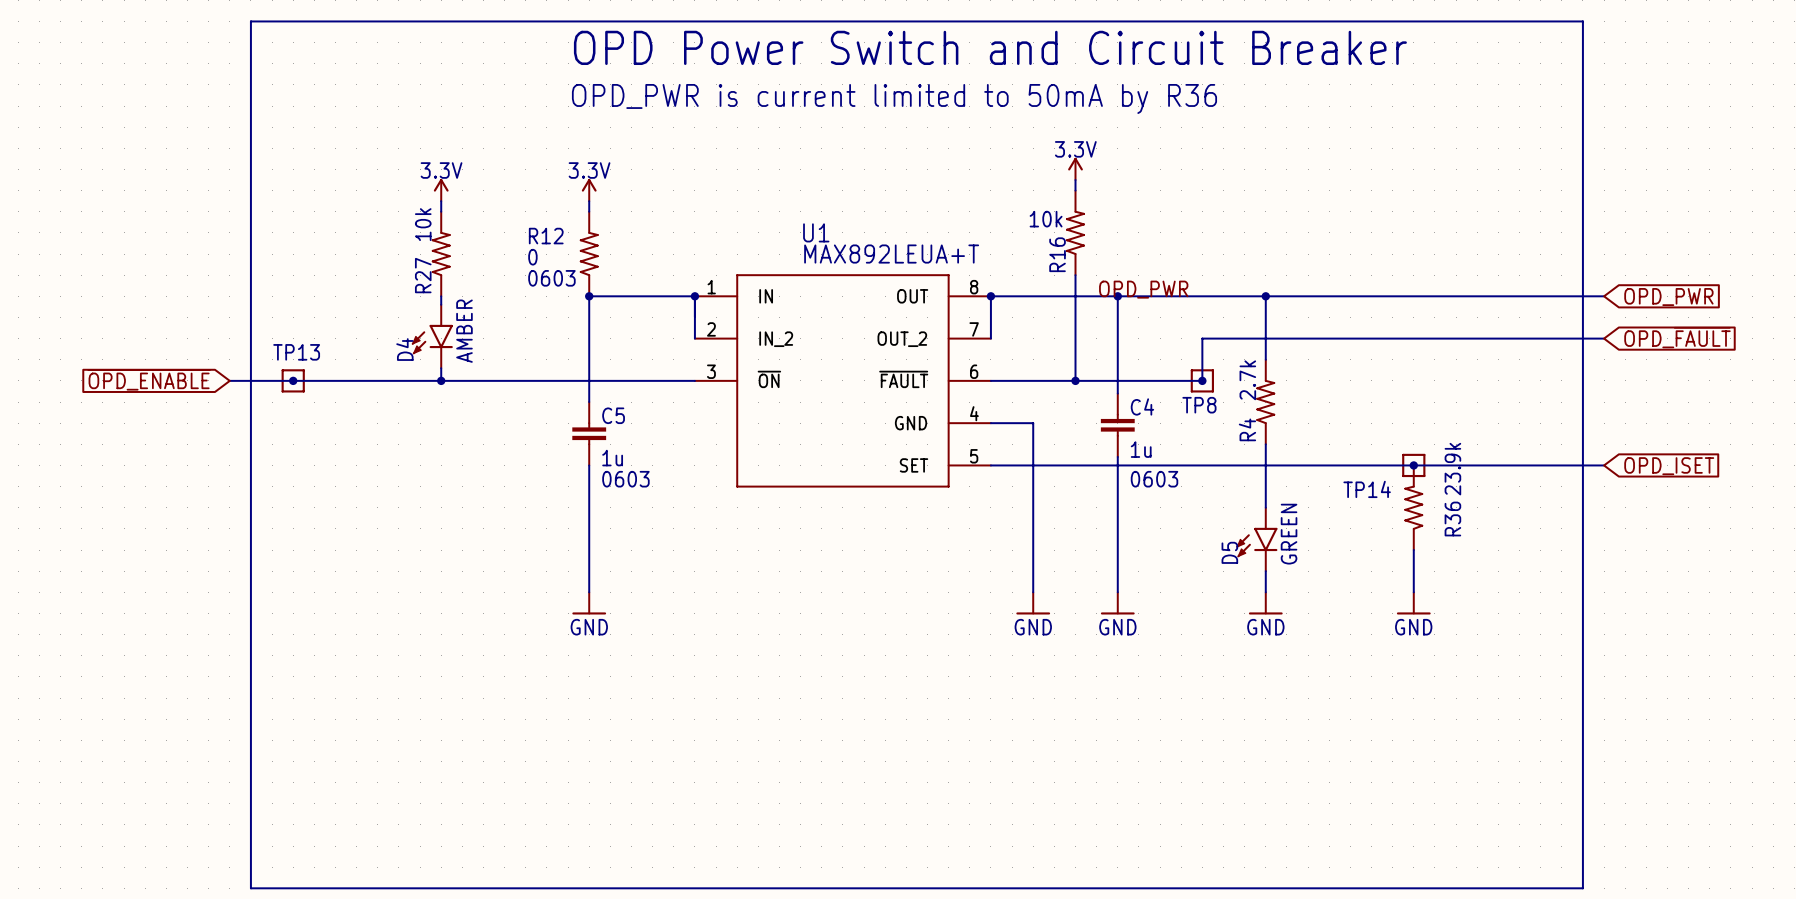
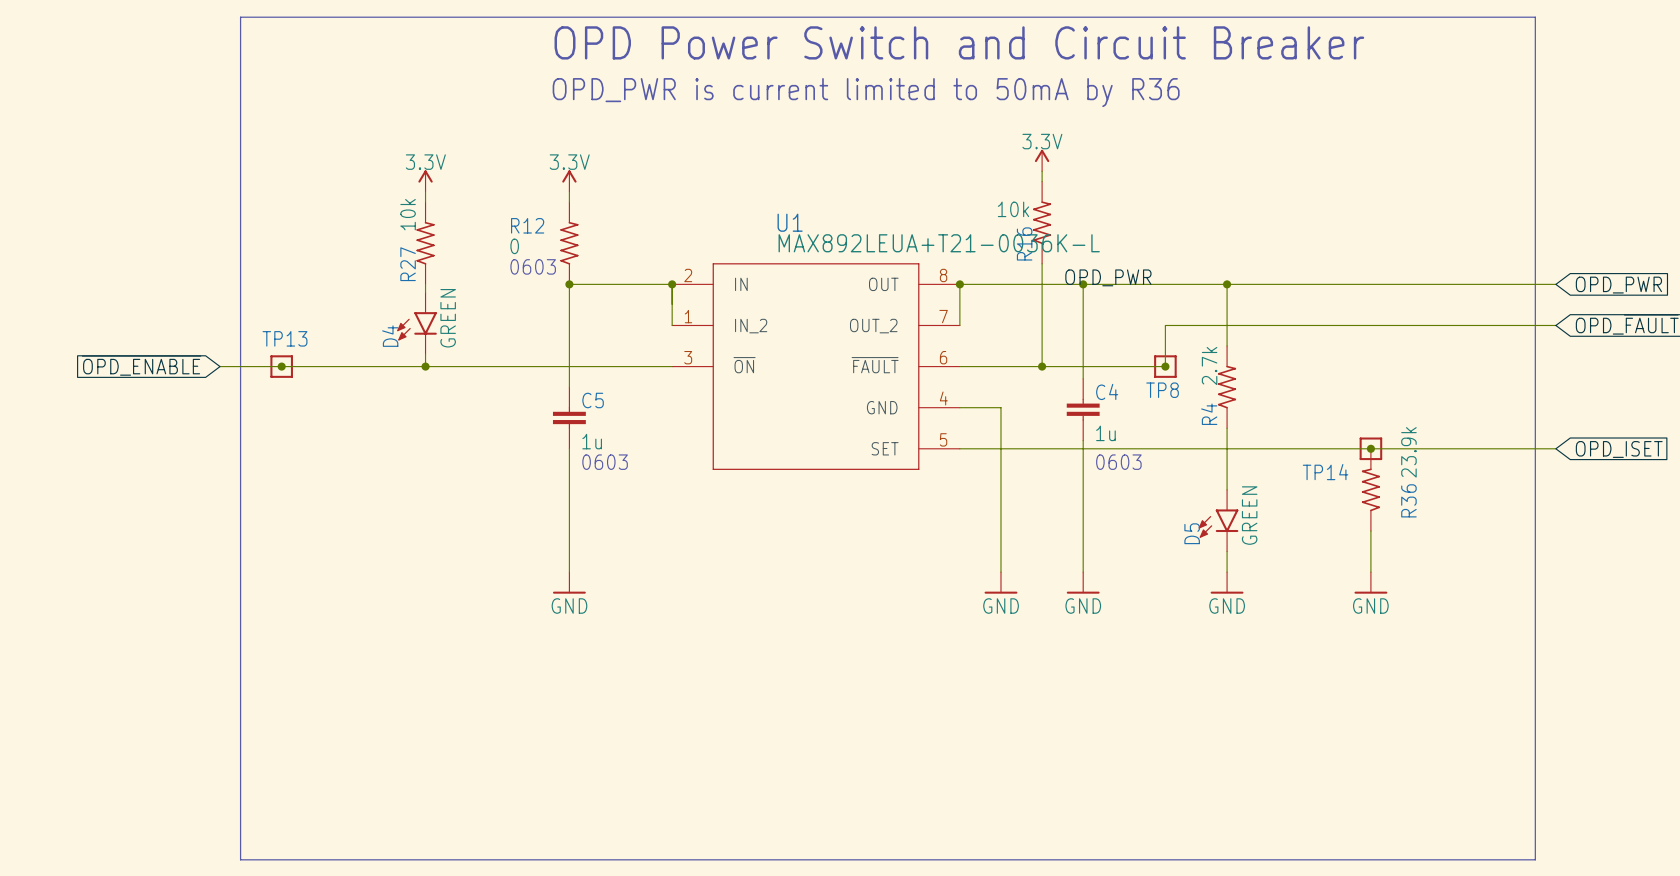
U1 value: MAX892LEUA+T (891, 254) -> MAX892LEUA+T21-0036K-L (939, 243)
U1 pin number: 1 (711, 287) -> 2 (688, 275)
U1 pin number: 2 (711, 329) -> 1 (688, 316)
D4 value: AMBER (464, 331) -> GREEN (448, 318)

